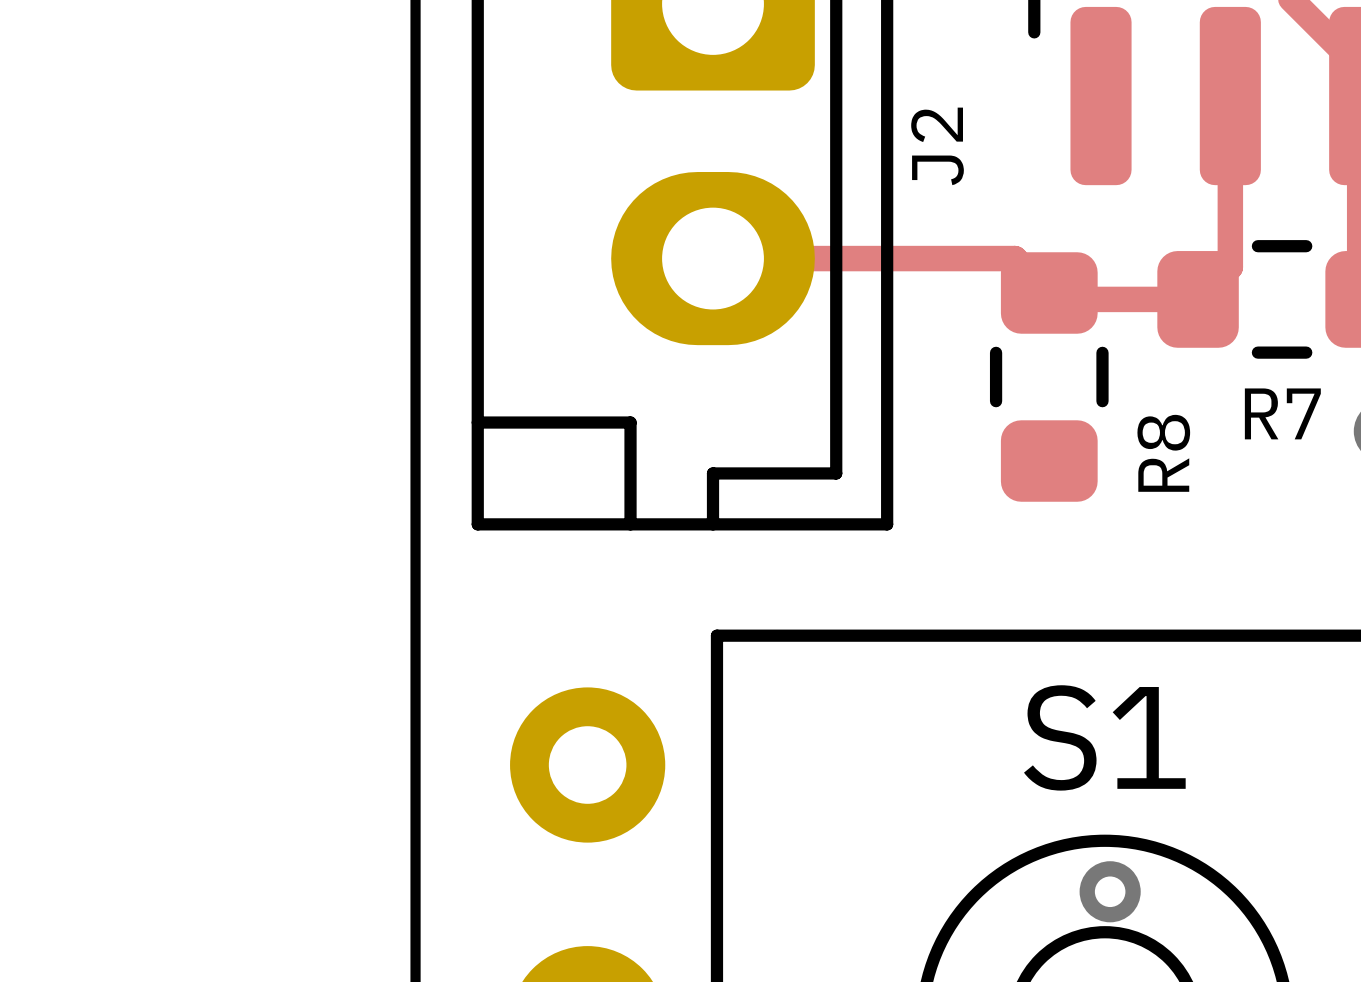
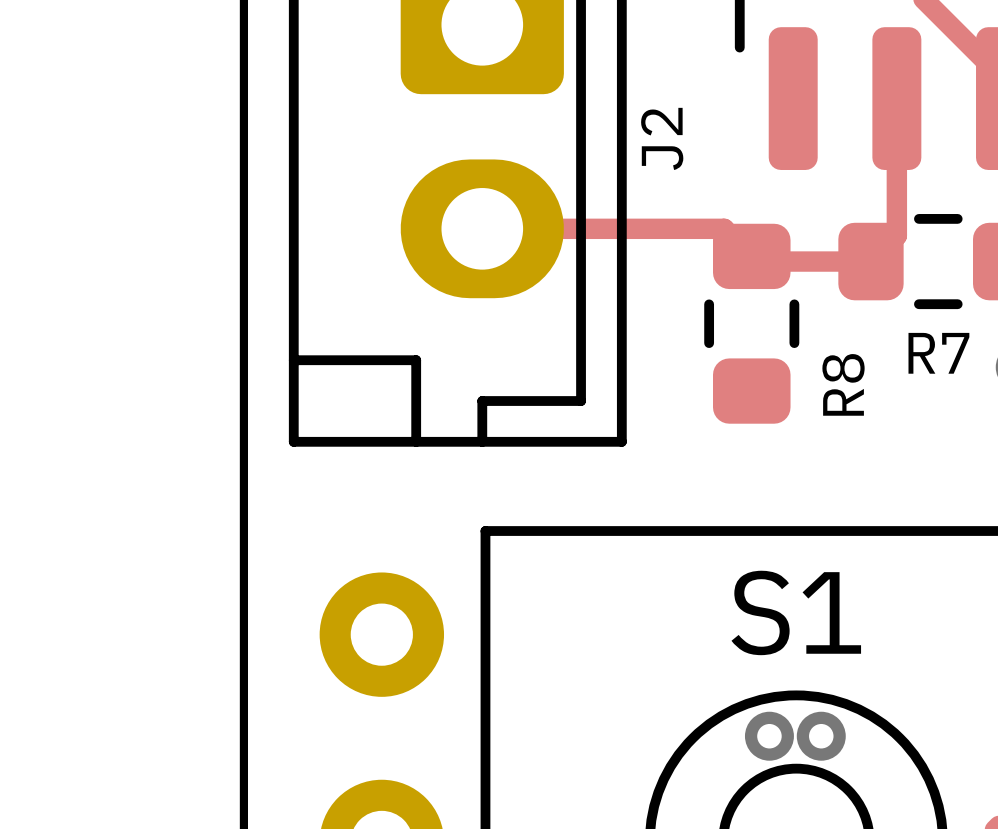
via: none -> (769, 736)
via: (1110, 891) -> none
via: none -> (821, 736)

